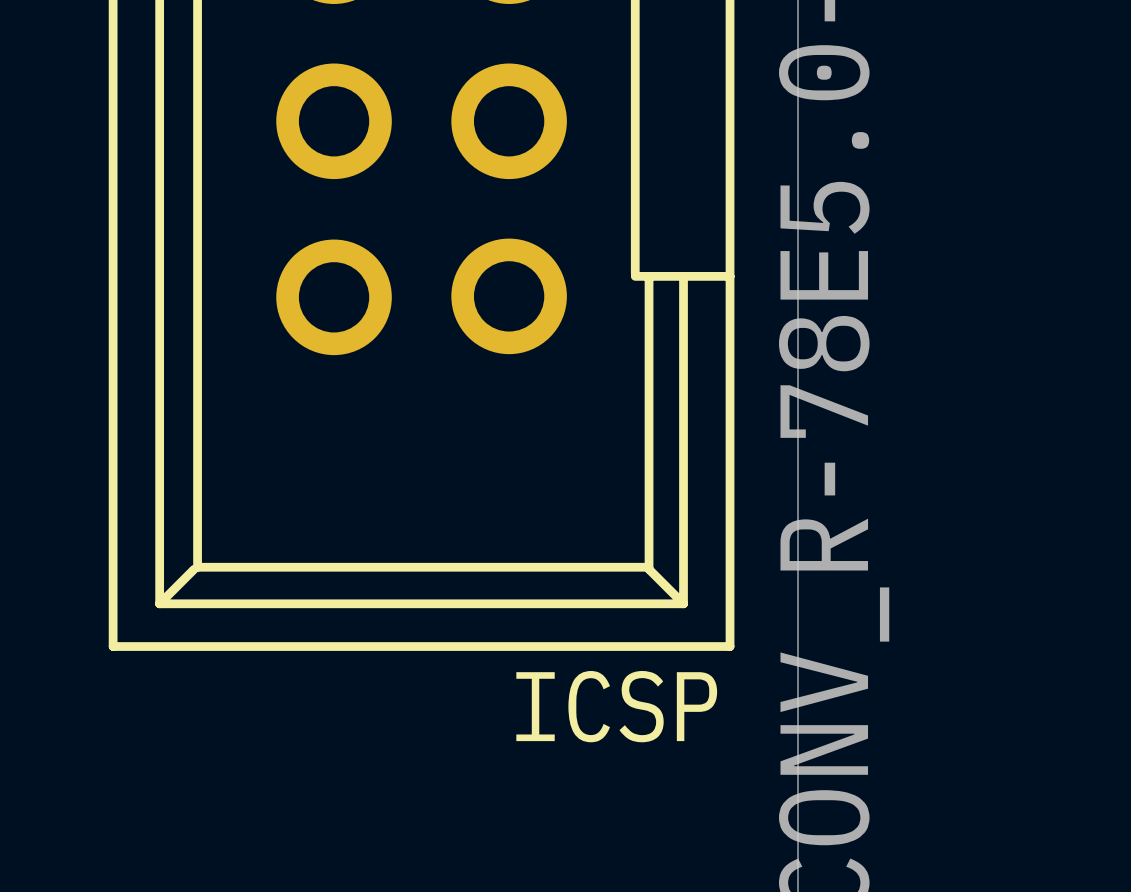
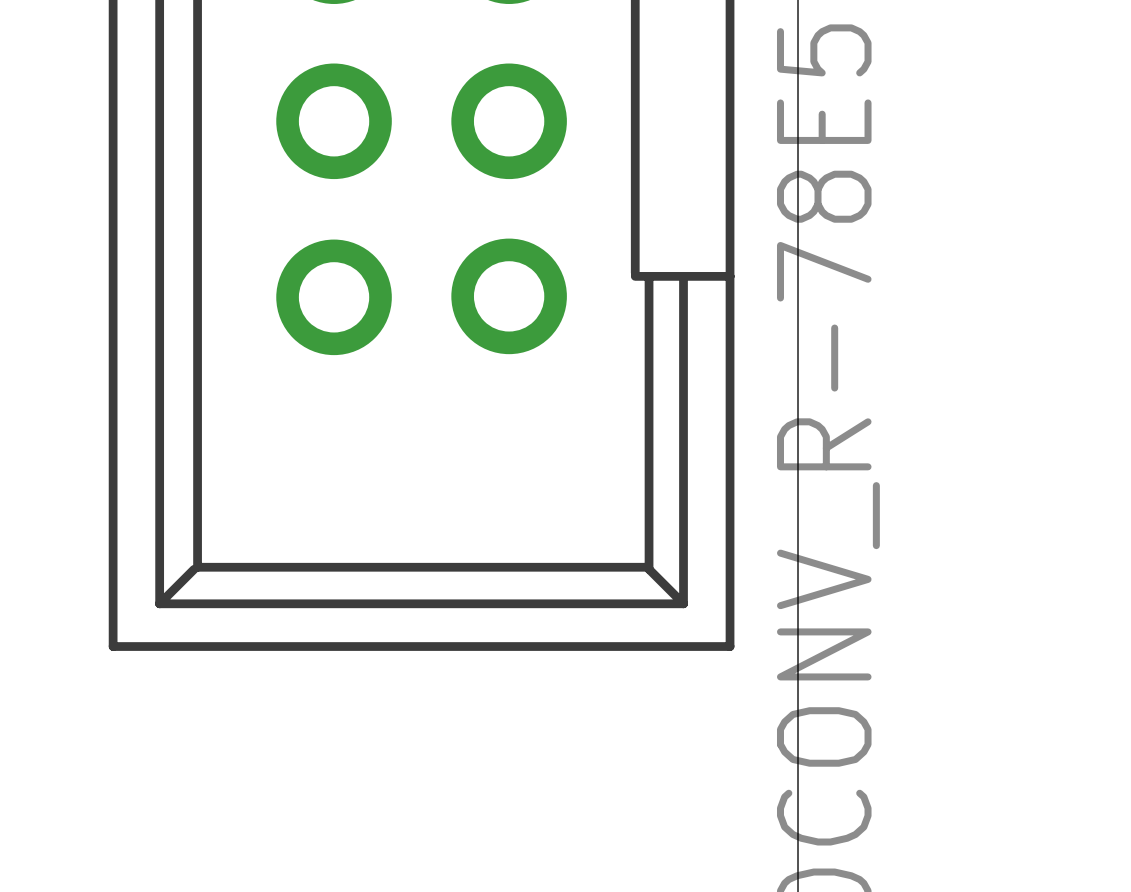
text: ICSP (616, 706) -> none

